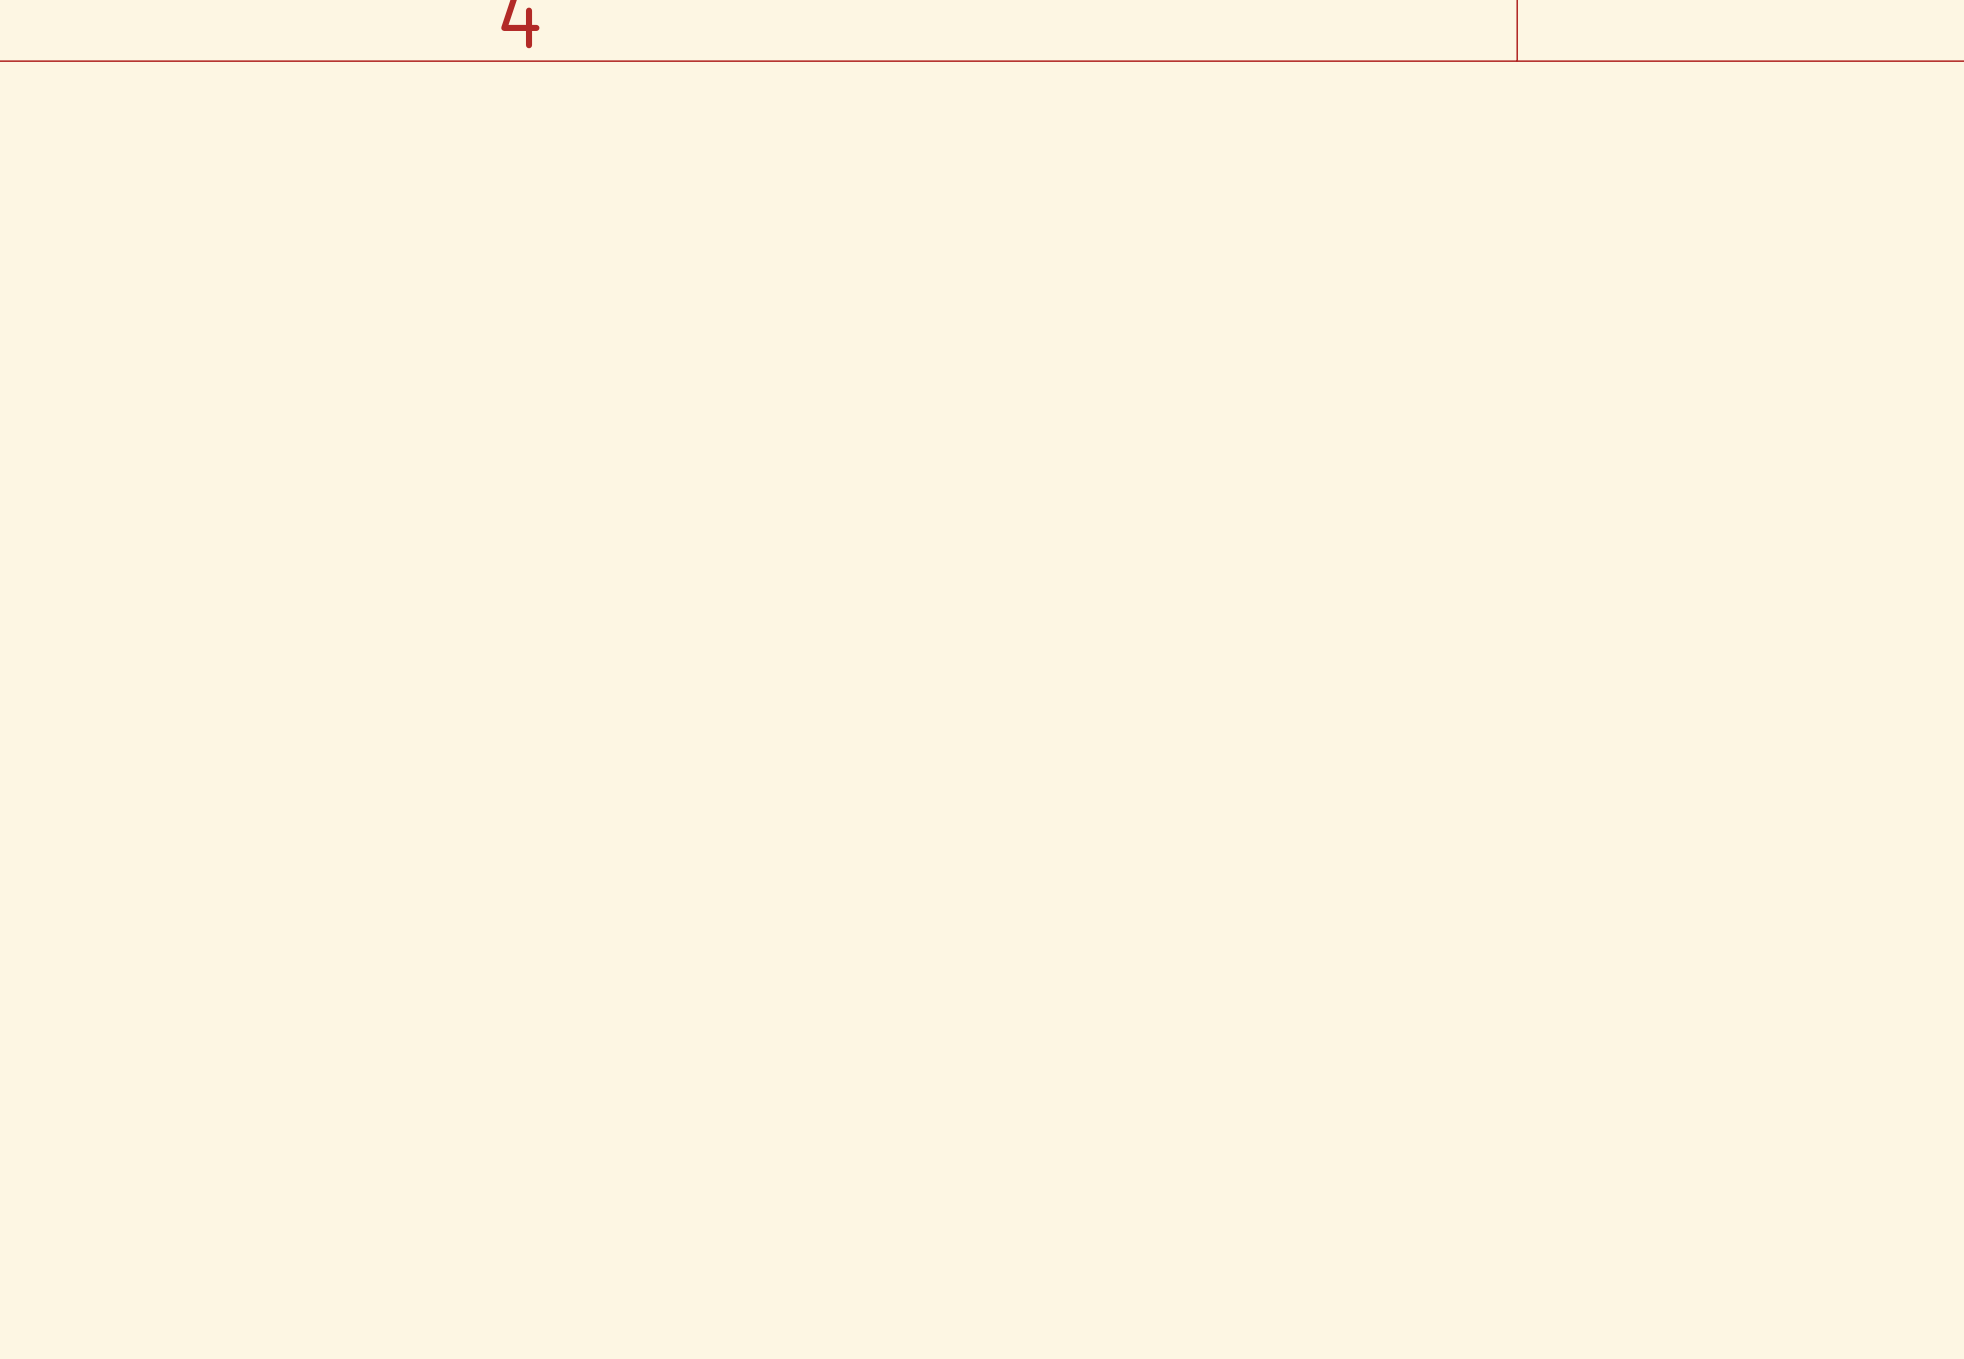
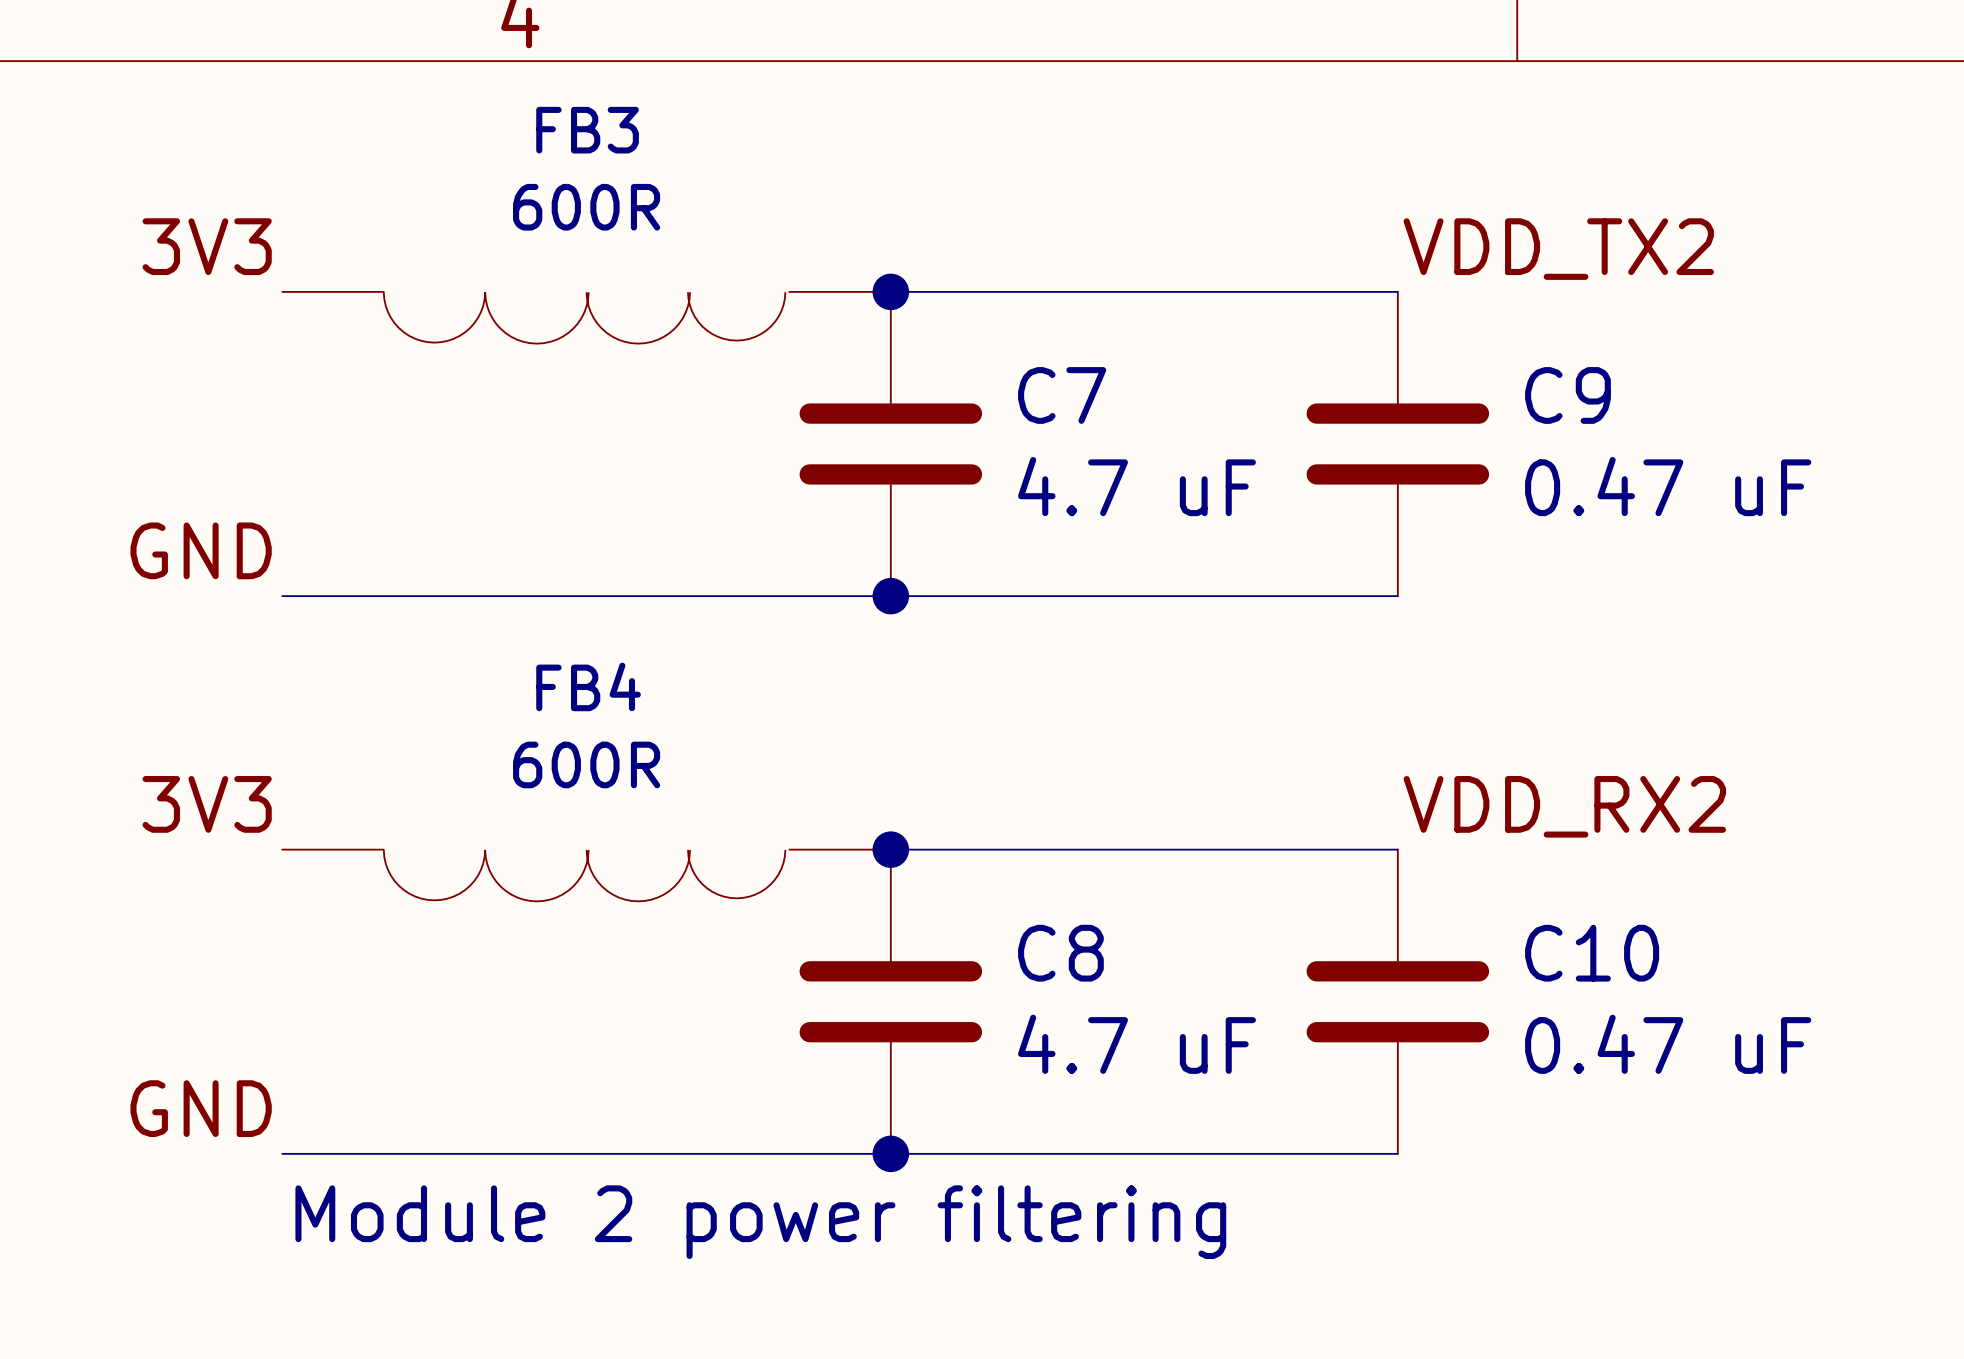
label: none -> 3V3 (207, 246)
label: none -> VDD_TX2 (1558, 249)
wire: none -> (890, 291) (1397, 291)
junction: none -> (890, 291)
FB3: none -> 600R (586, 317)
C7: none -> 4.7 uF (890, 444)
C9: none -> 0.47 uF (1397, 444)
label: none -> GND (201, 550)
wire: none -> (282, 596) (1397, 596)
junction: none -> (890, 596)
label: none -> 3V3 (207, 804)
label: none -> VDD_RX2 (1564, 806)
wire: none -> (890, 849) (1397, 849)
junction: none -> (890, 849)
FB4: none -> 600R (586, 875)
C8: none -> 4.7 uF (890, 1001)
C10: none -> 0.47 uF (1397, 1001)
label: none -> GND (201, 1108)
wire: none -> (282, 1153) (1397, 1153)
junction: none -> (890, 1153)
text: none -> Module 2 power filtering (760, 1222)

